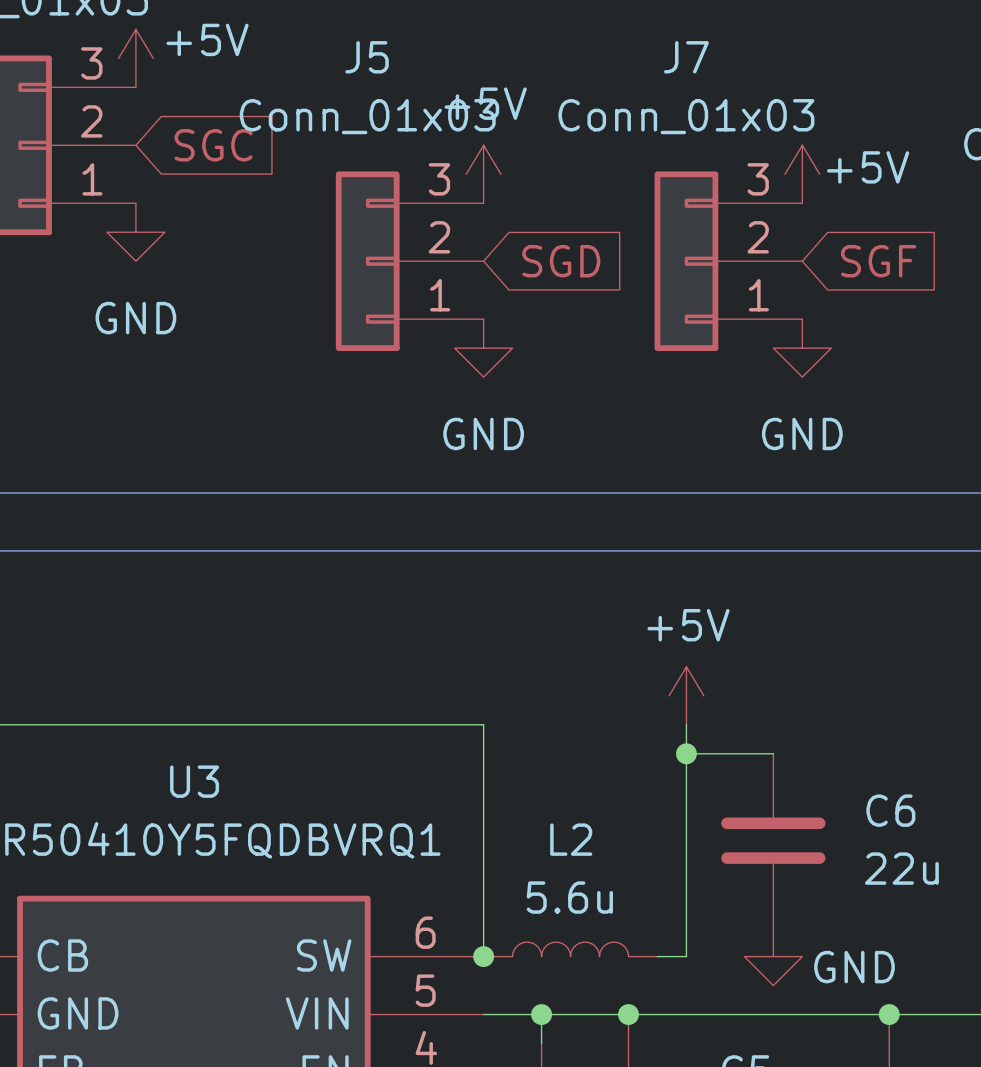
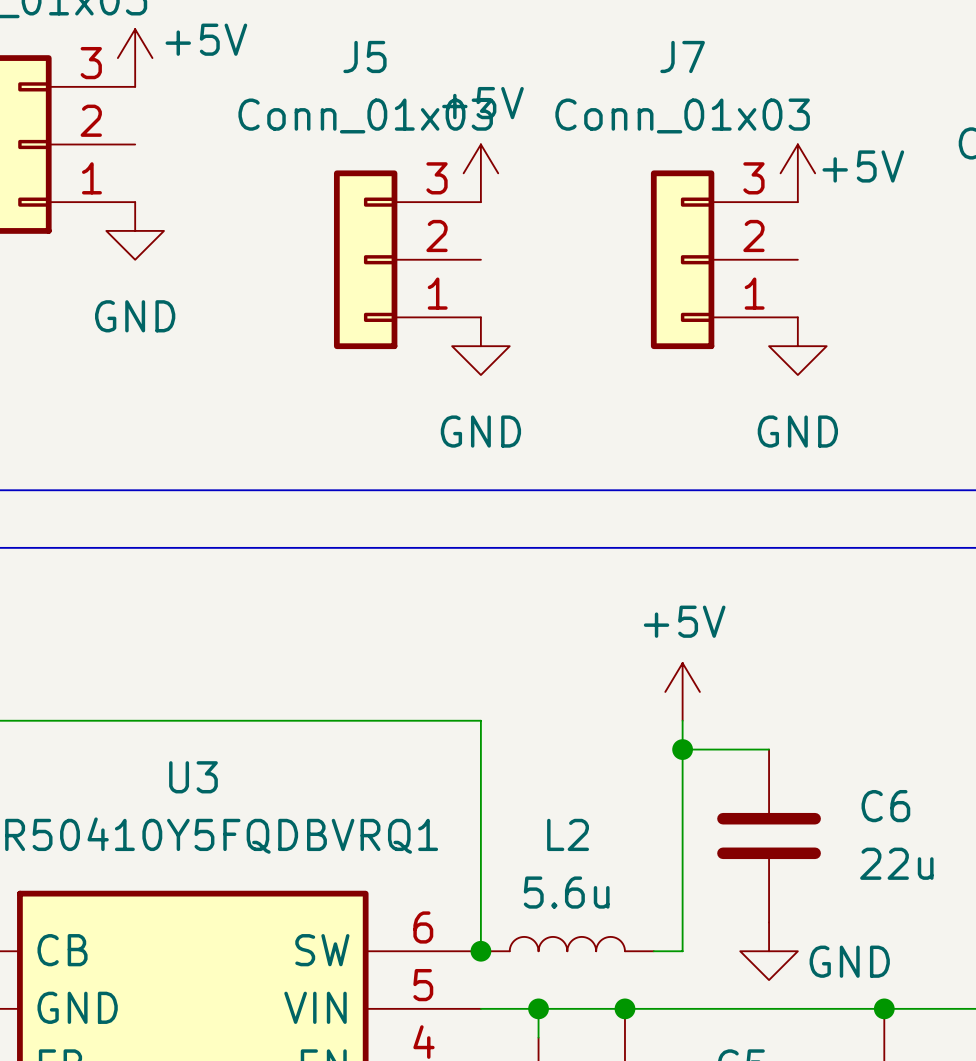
global label: SGC (213, 145) -> none
global label: SGD (561, 261) -> none
global label: SGF (878, 261) -> none

